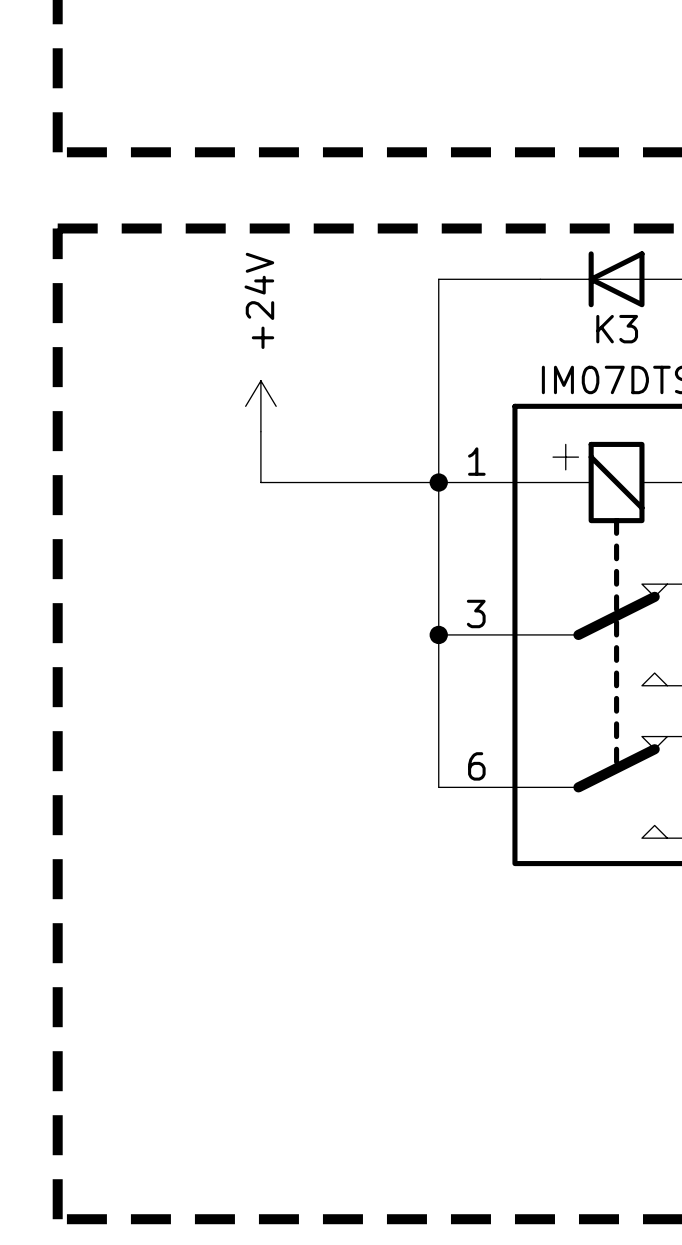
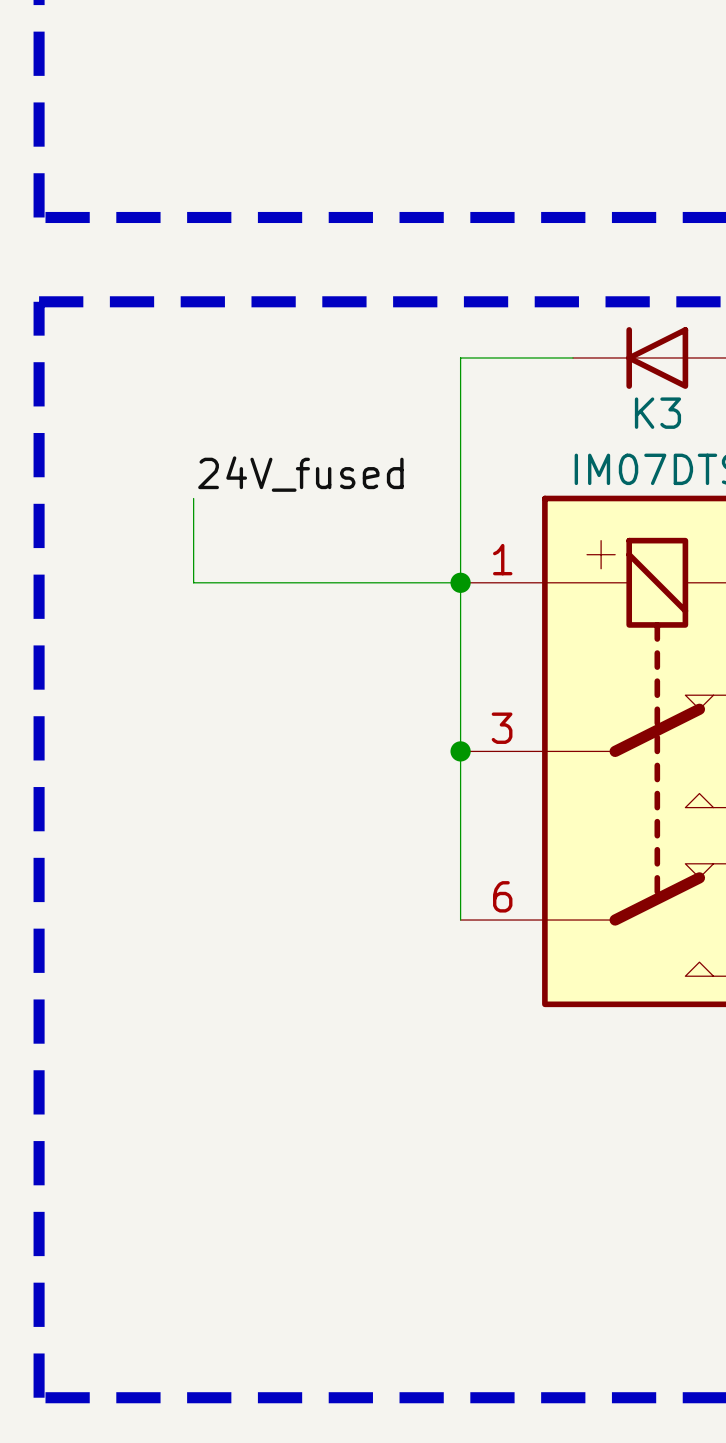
label: none -> 24V_fused (300, 474)
power symbol: +24V (260, 406) -> none
wire: (260, 431) (260, 482) -> (193, 498) (193, 582) (263, 582)

